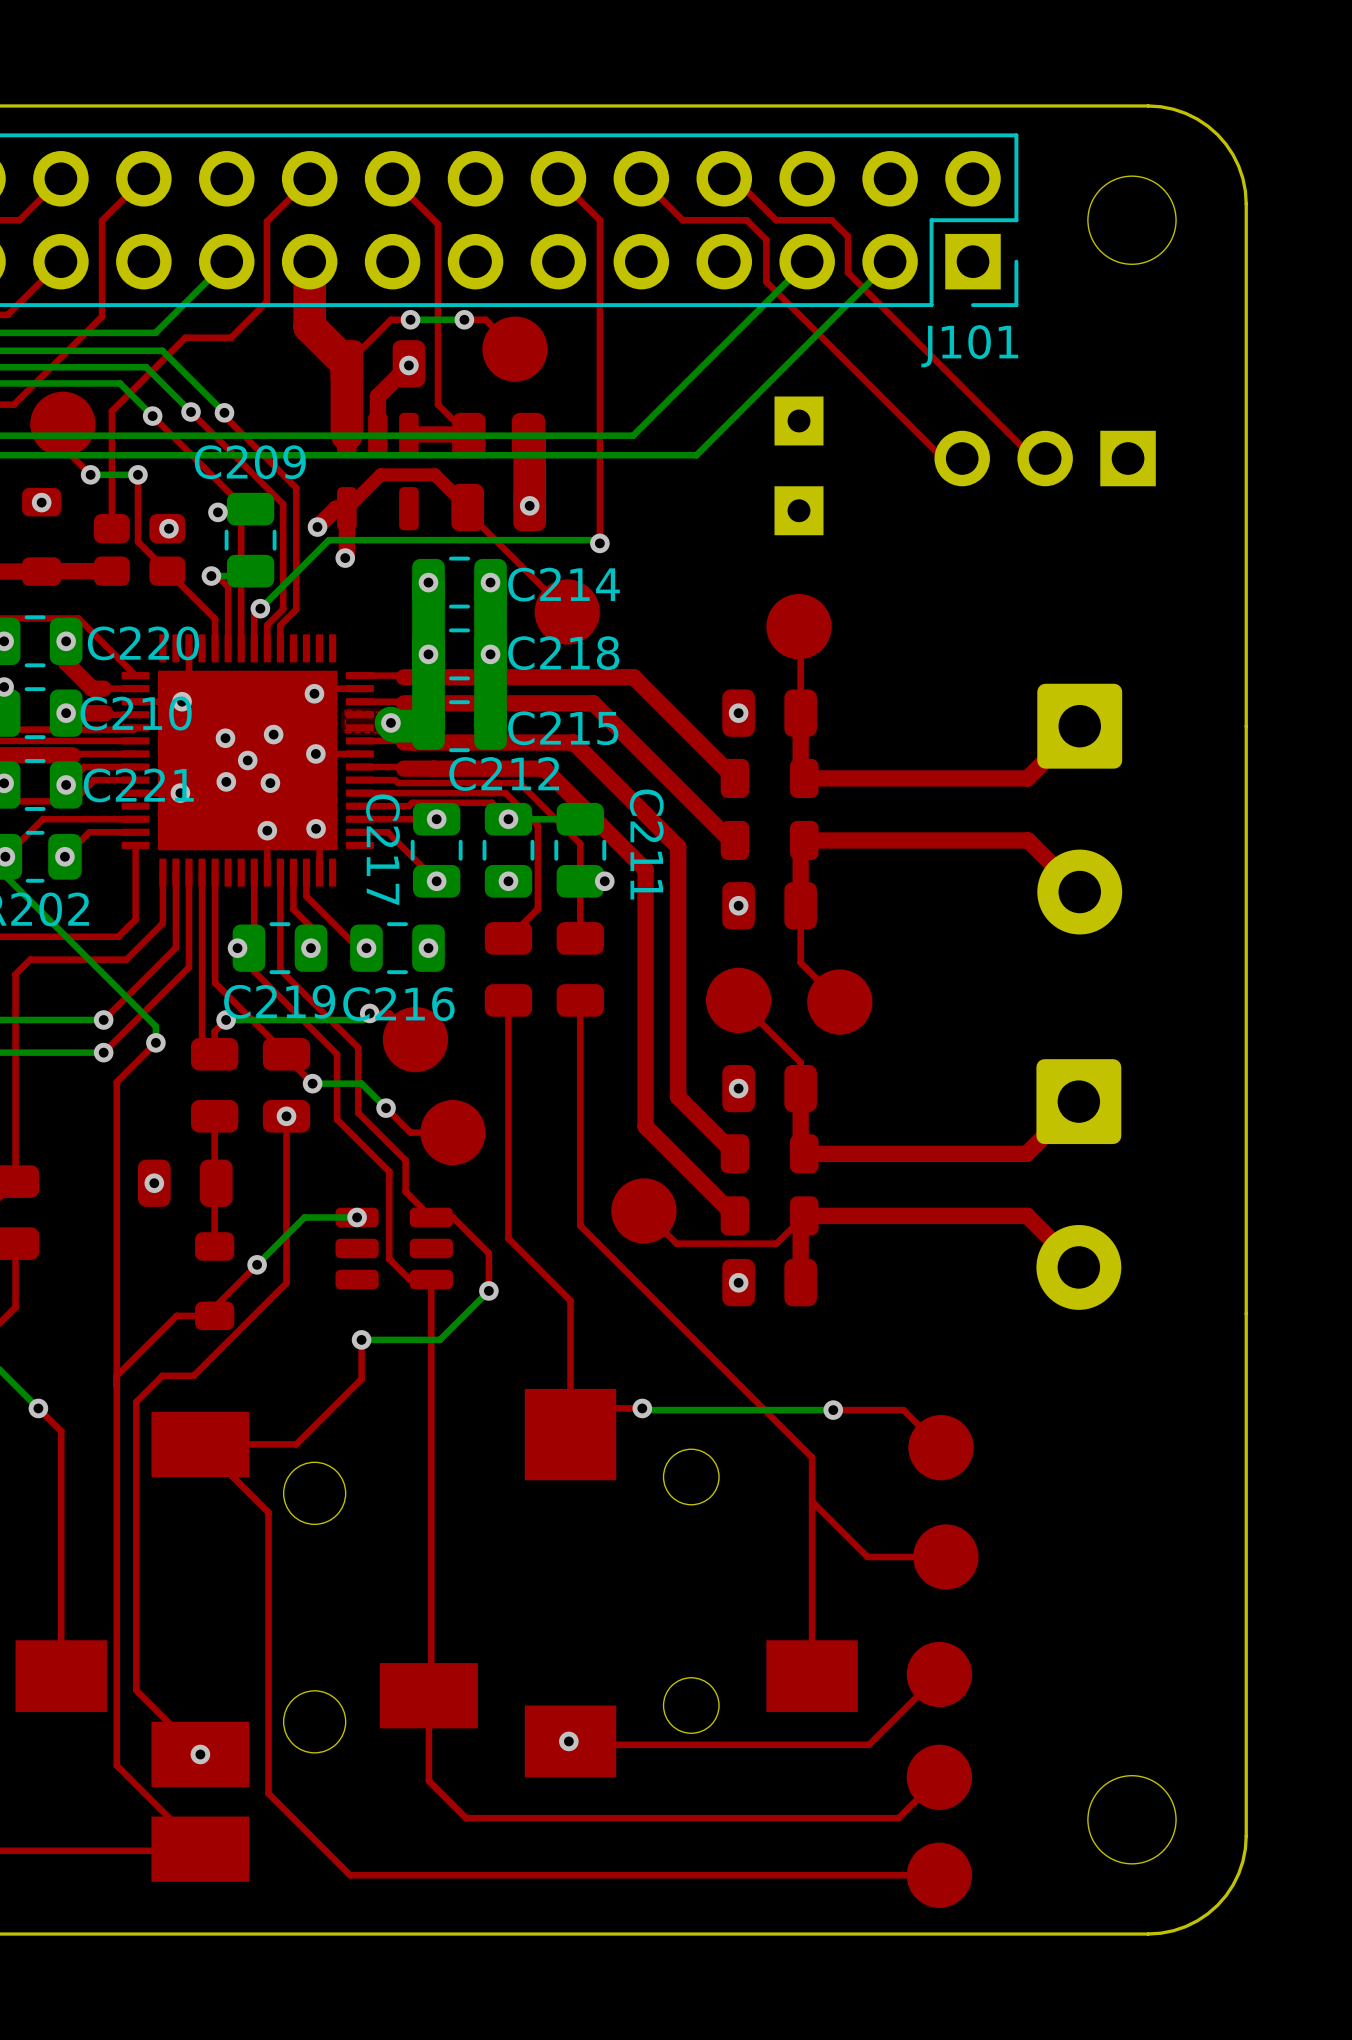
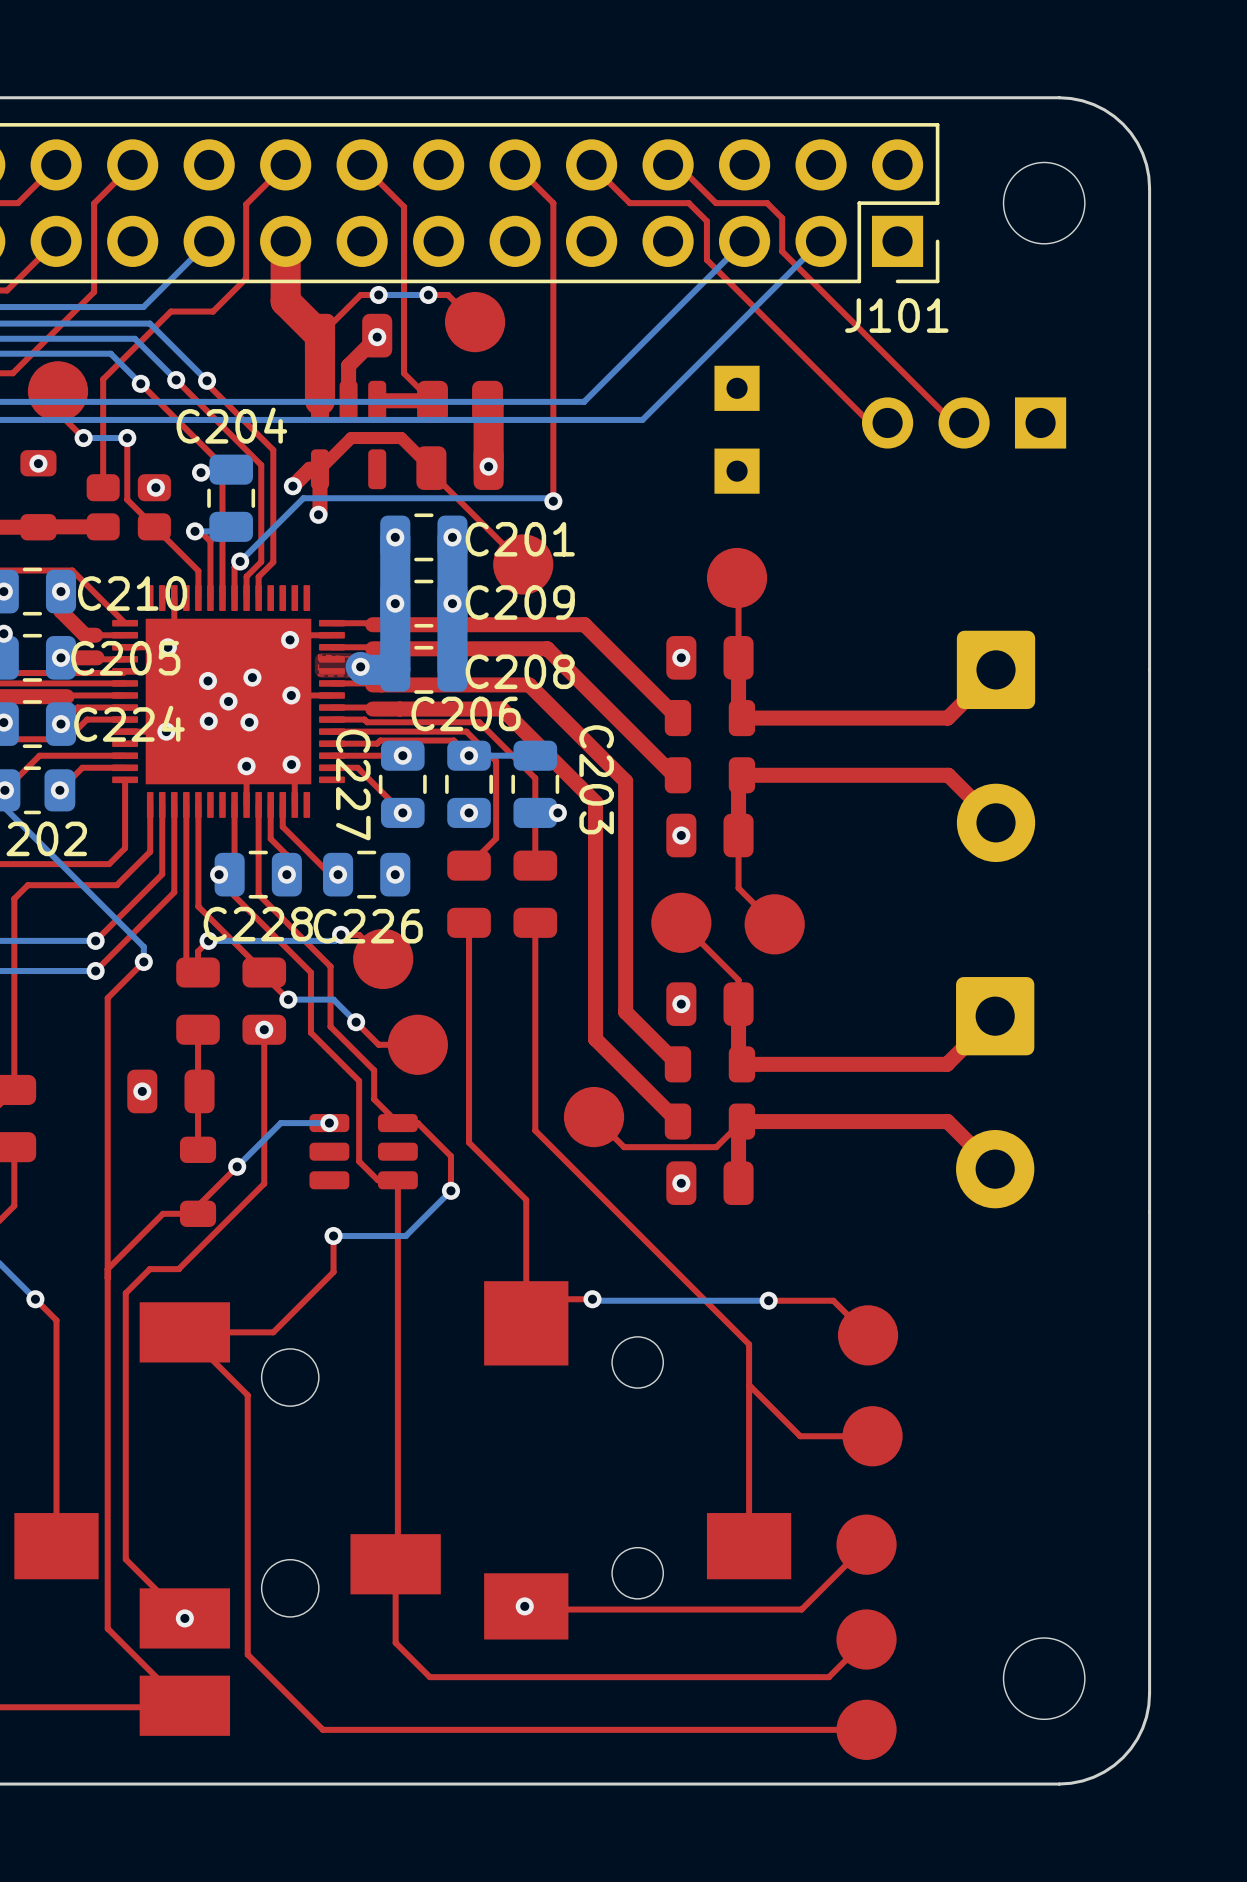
C209 name: C209 (250, 462) -> C204 (231, 425)
C214 name: C214 (563, 584) -> C201 (520, 539)
C220 name: C220 (143, 643) -> C210 (132, 593)
C218 name: C218 (563, 653) -> C209 (520, 602)
C210 name: C210 (136, 713) -> C205 (125, 658)
C215 name: C215 (563, 728) -> C208 (520, 671)
C212 name: C212 (504, 773) -> C206 (466, 713)
C221 name: C221 (138, 785) -> C224 (129, 723)
C211 name: C211 (646, 844) -> C203 (596, 779)
C217 name: C217 (383, 849) -> C227 (353, 785)
C219 name: C219 (279, 1001) -> C228 (258, 924)
C216 name: C216 (398, 1004) -> C226 (368, 926)

